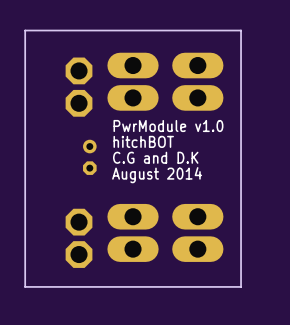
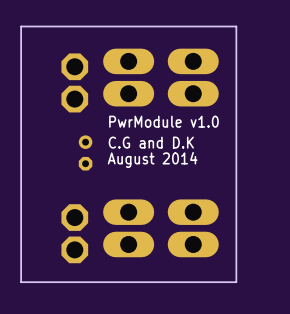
text: hitchBOT (143, 141) -> C.G and D.K (151, 142)
text: C.G and D.K (155, 157) -> August 2014 (152, 159)
text: August 2014 (157, 175) -> none

